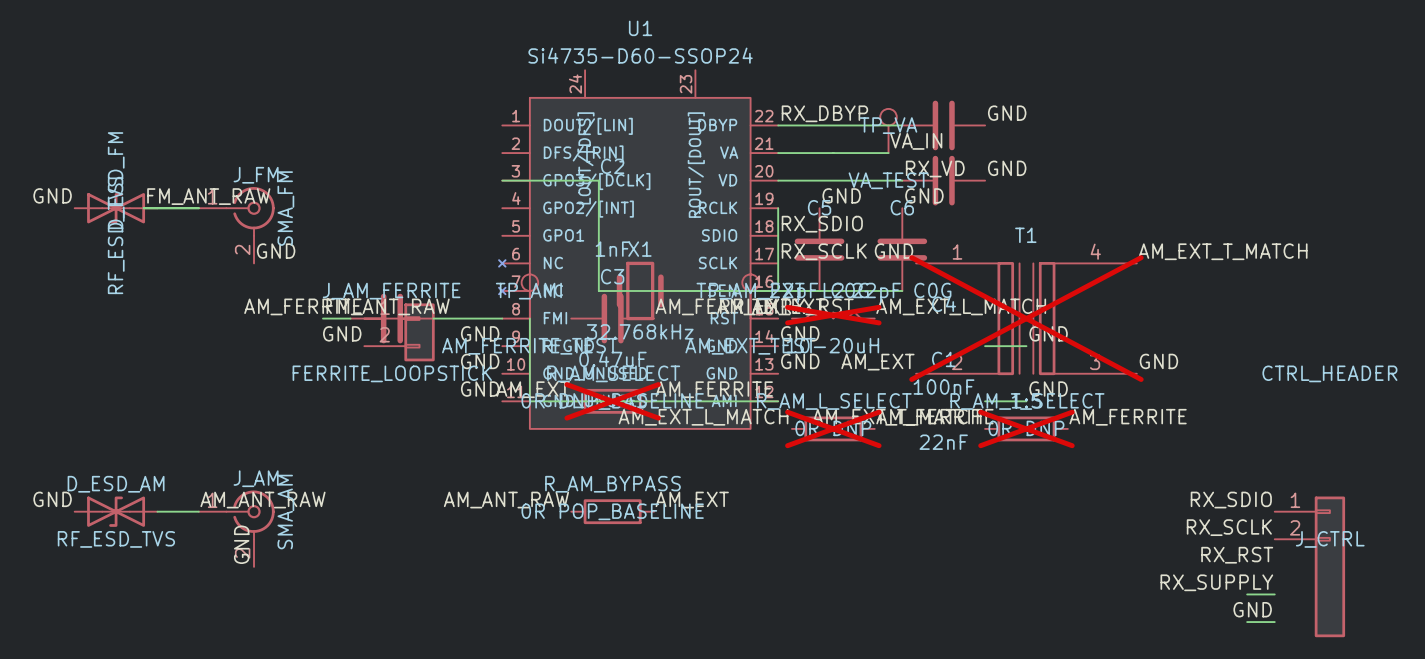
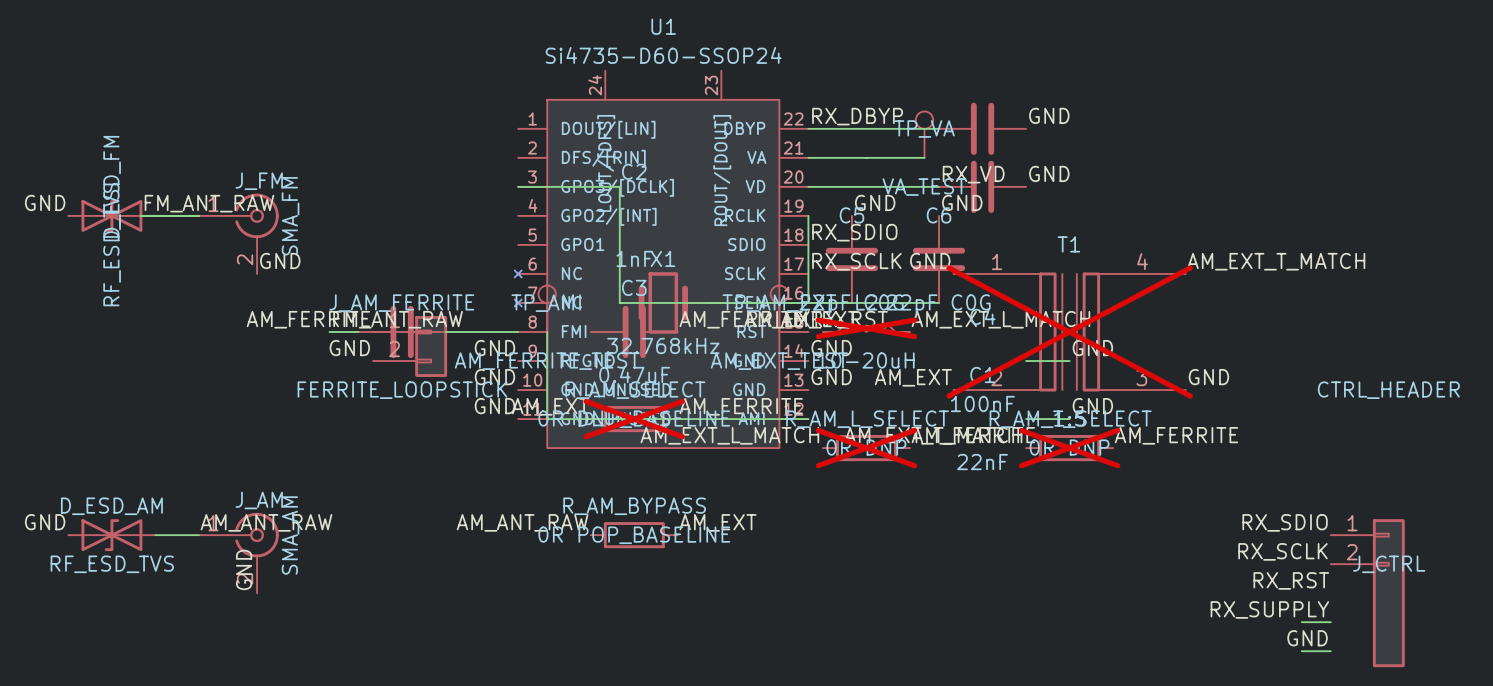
label: VA_IN (916, 141) -> none

